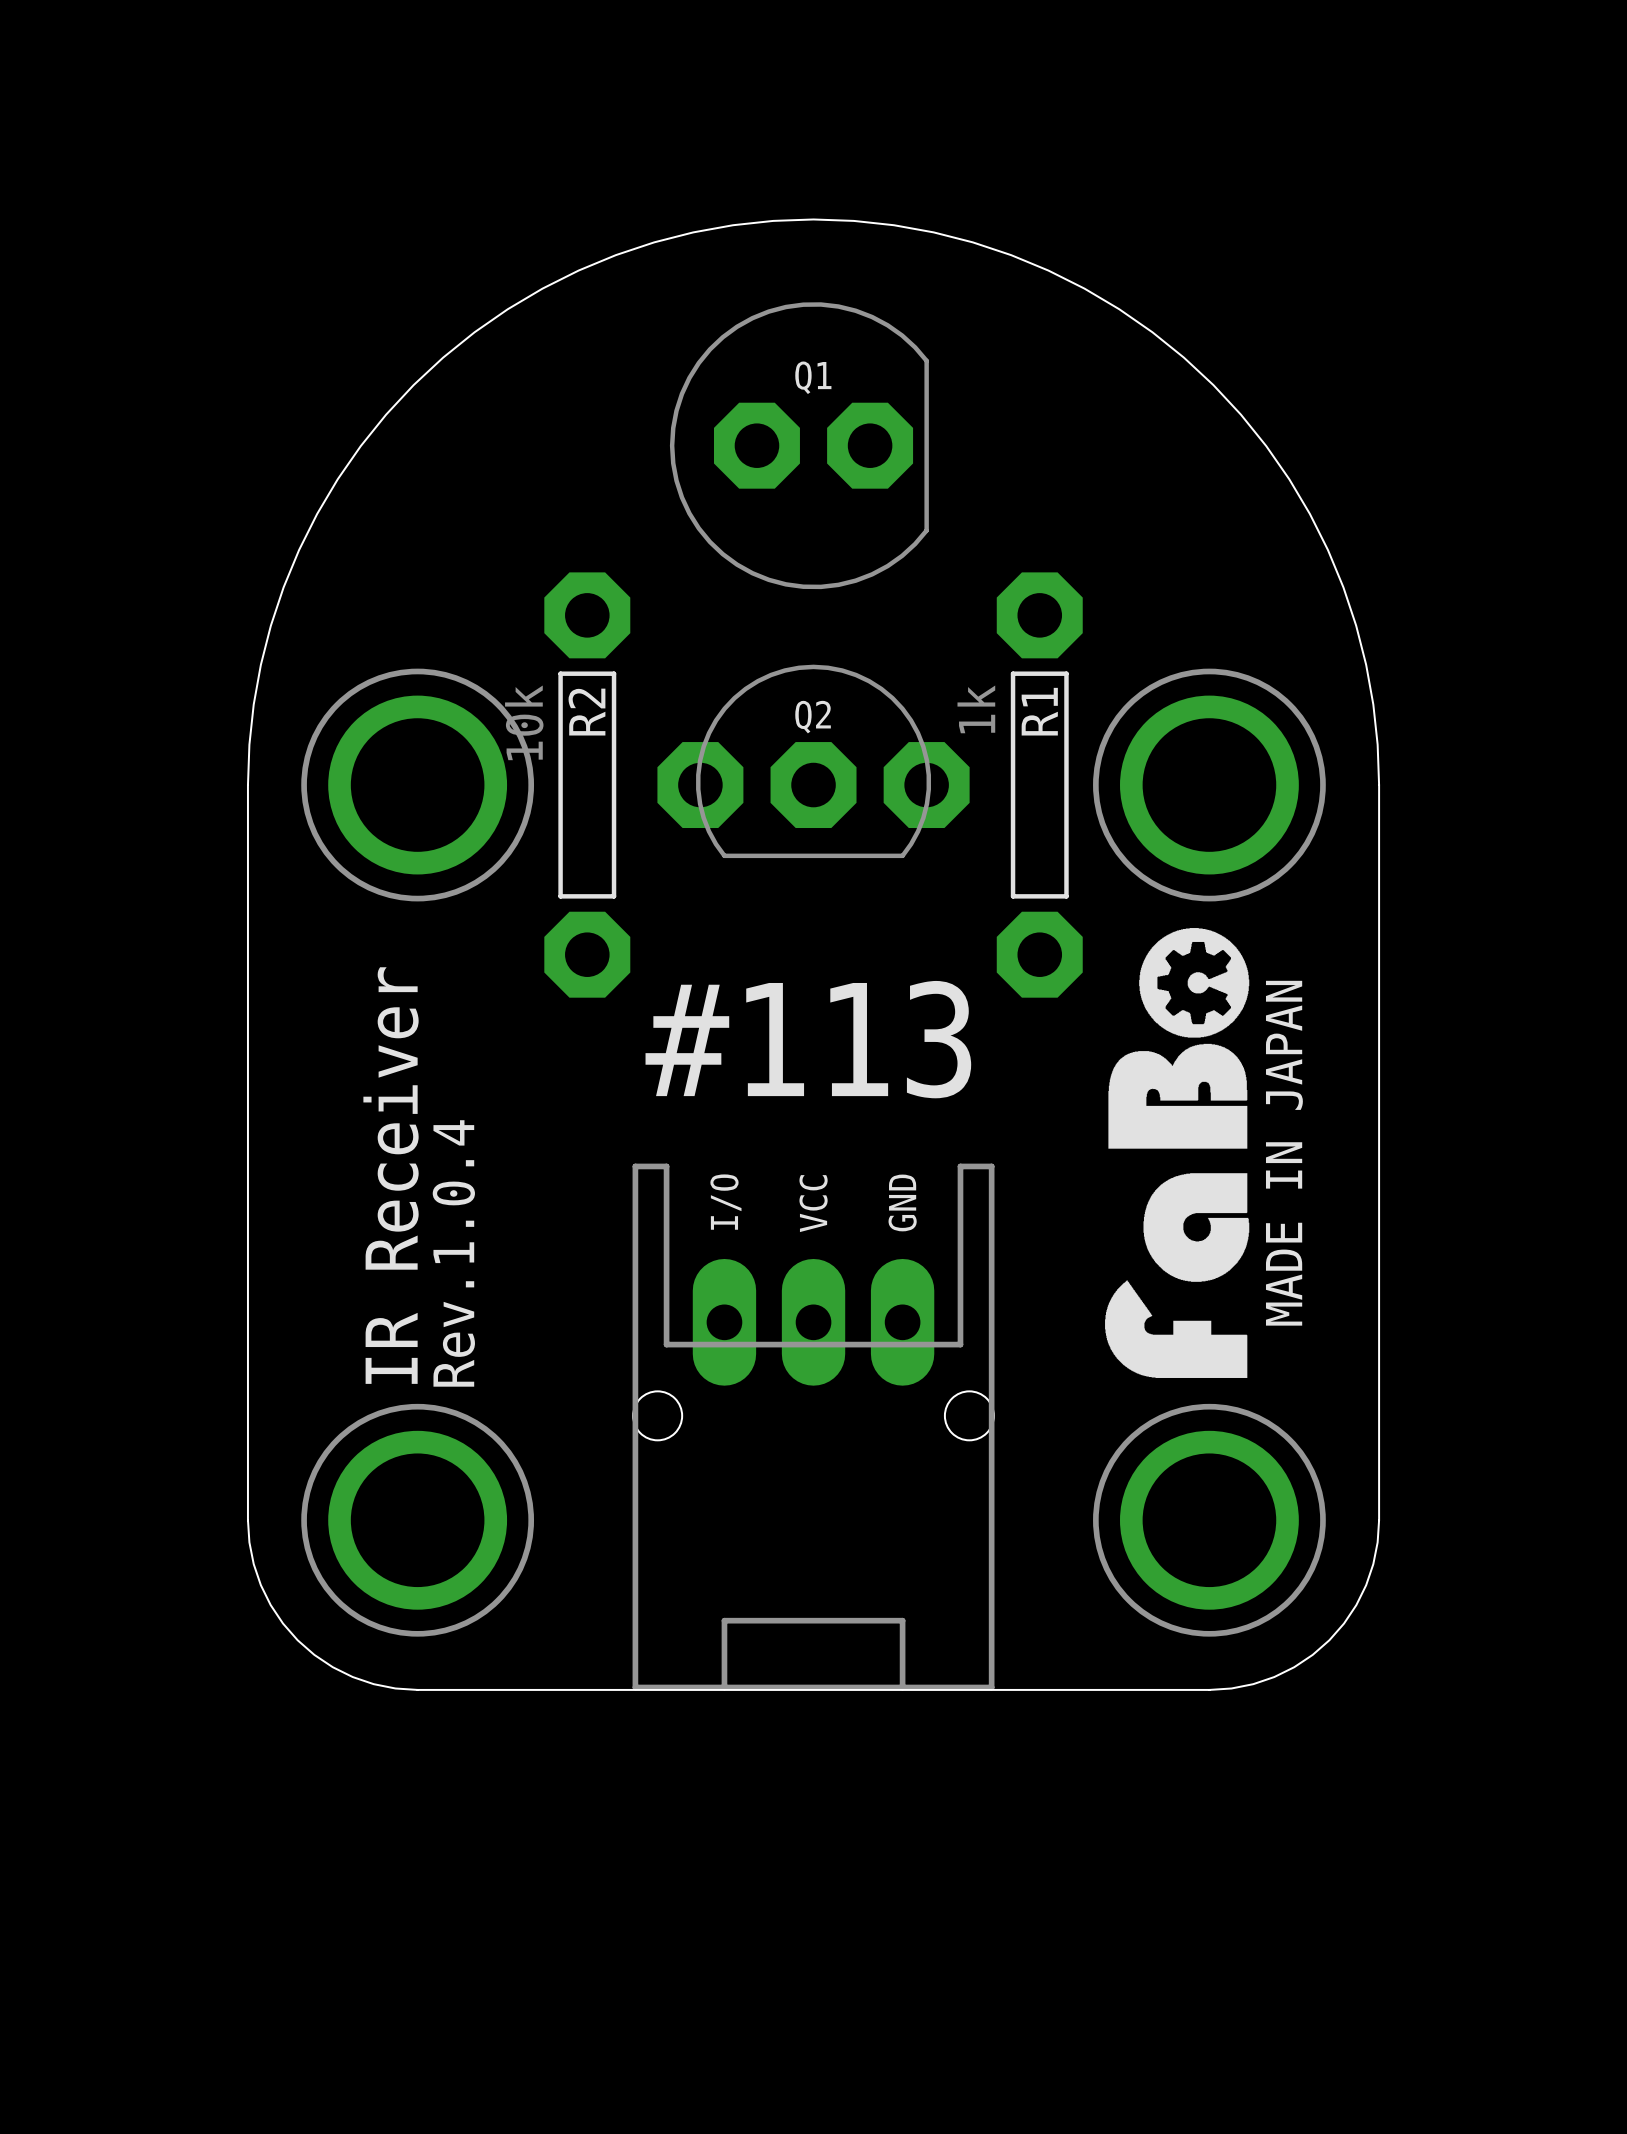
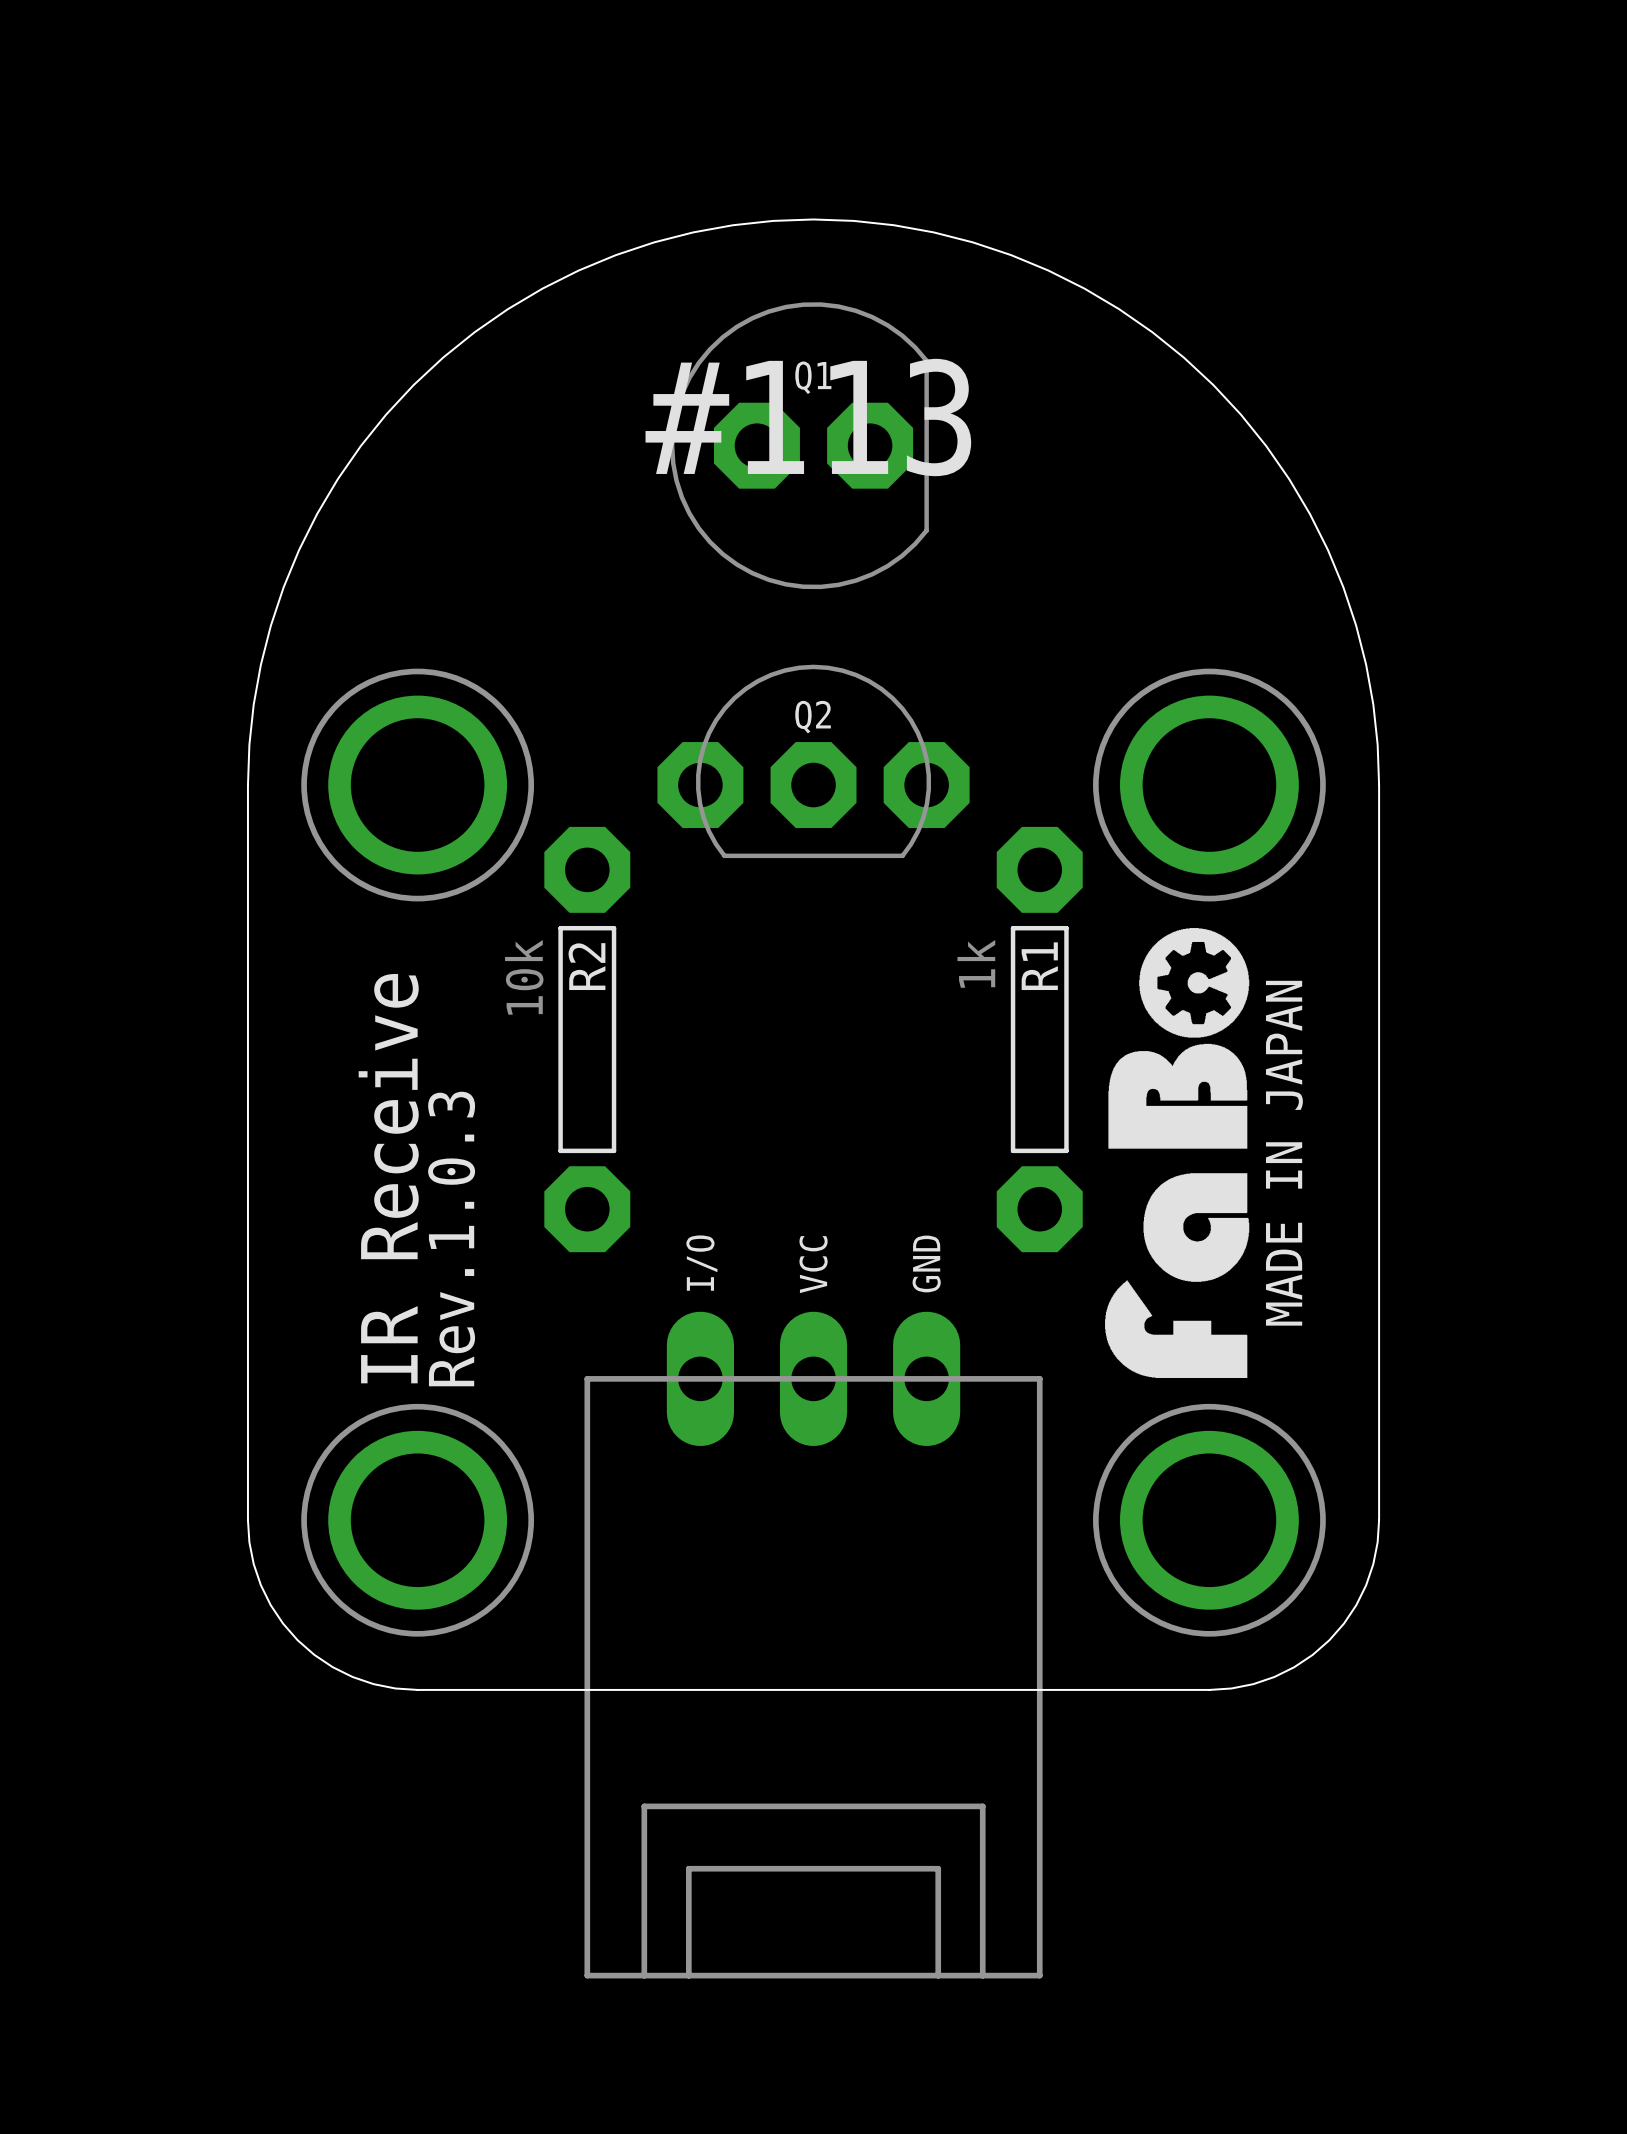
R2 position: (587, 785) -> (587, 1039)
R1 position: (1039, 785) -> (1039, 1039)
part: (813, 954) -> none
text position: #113 (808, 1039) -> #113 (808, 417)
part: none -> (813, 1098)
text: IR Receiver (391, 1175) -> IR Receive (388, 1178)
text: Rev.1.0.4 (453, 1253) -> Rev.1.0.3 (451, 1239)

